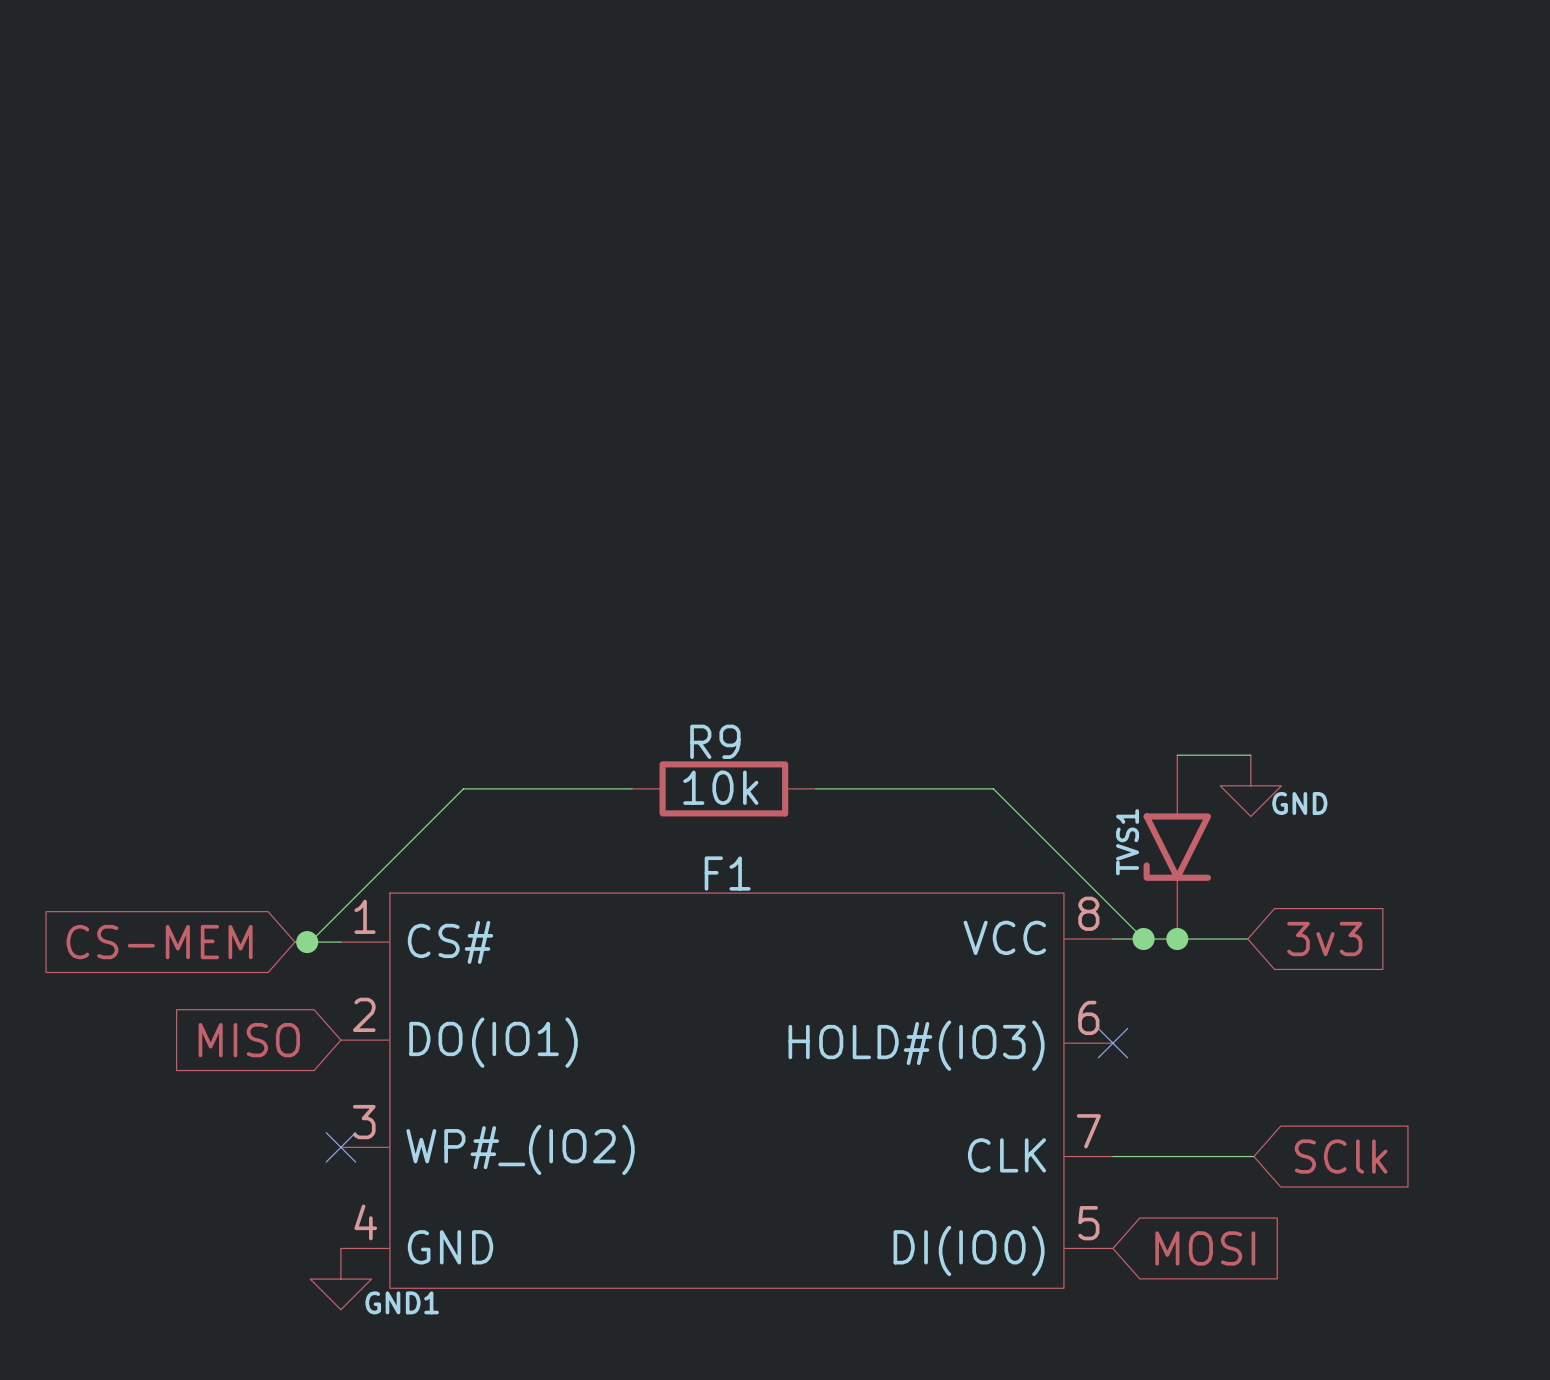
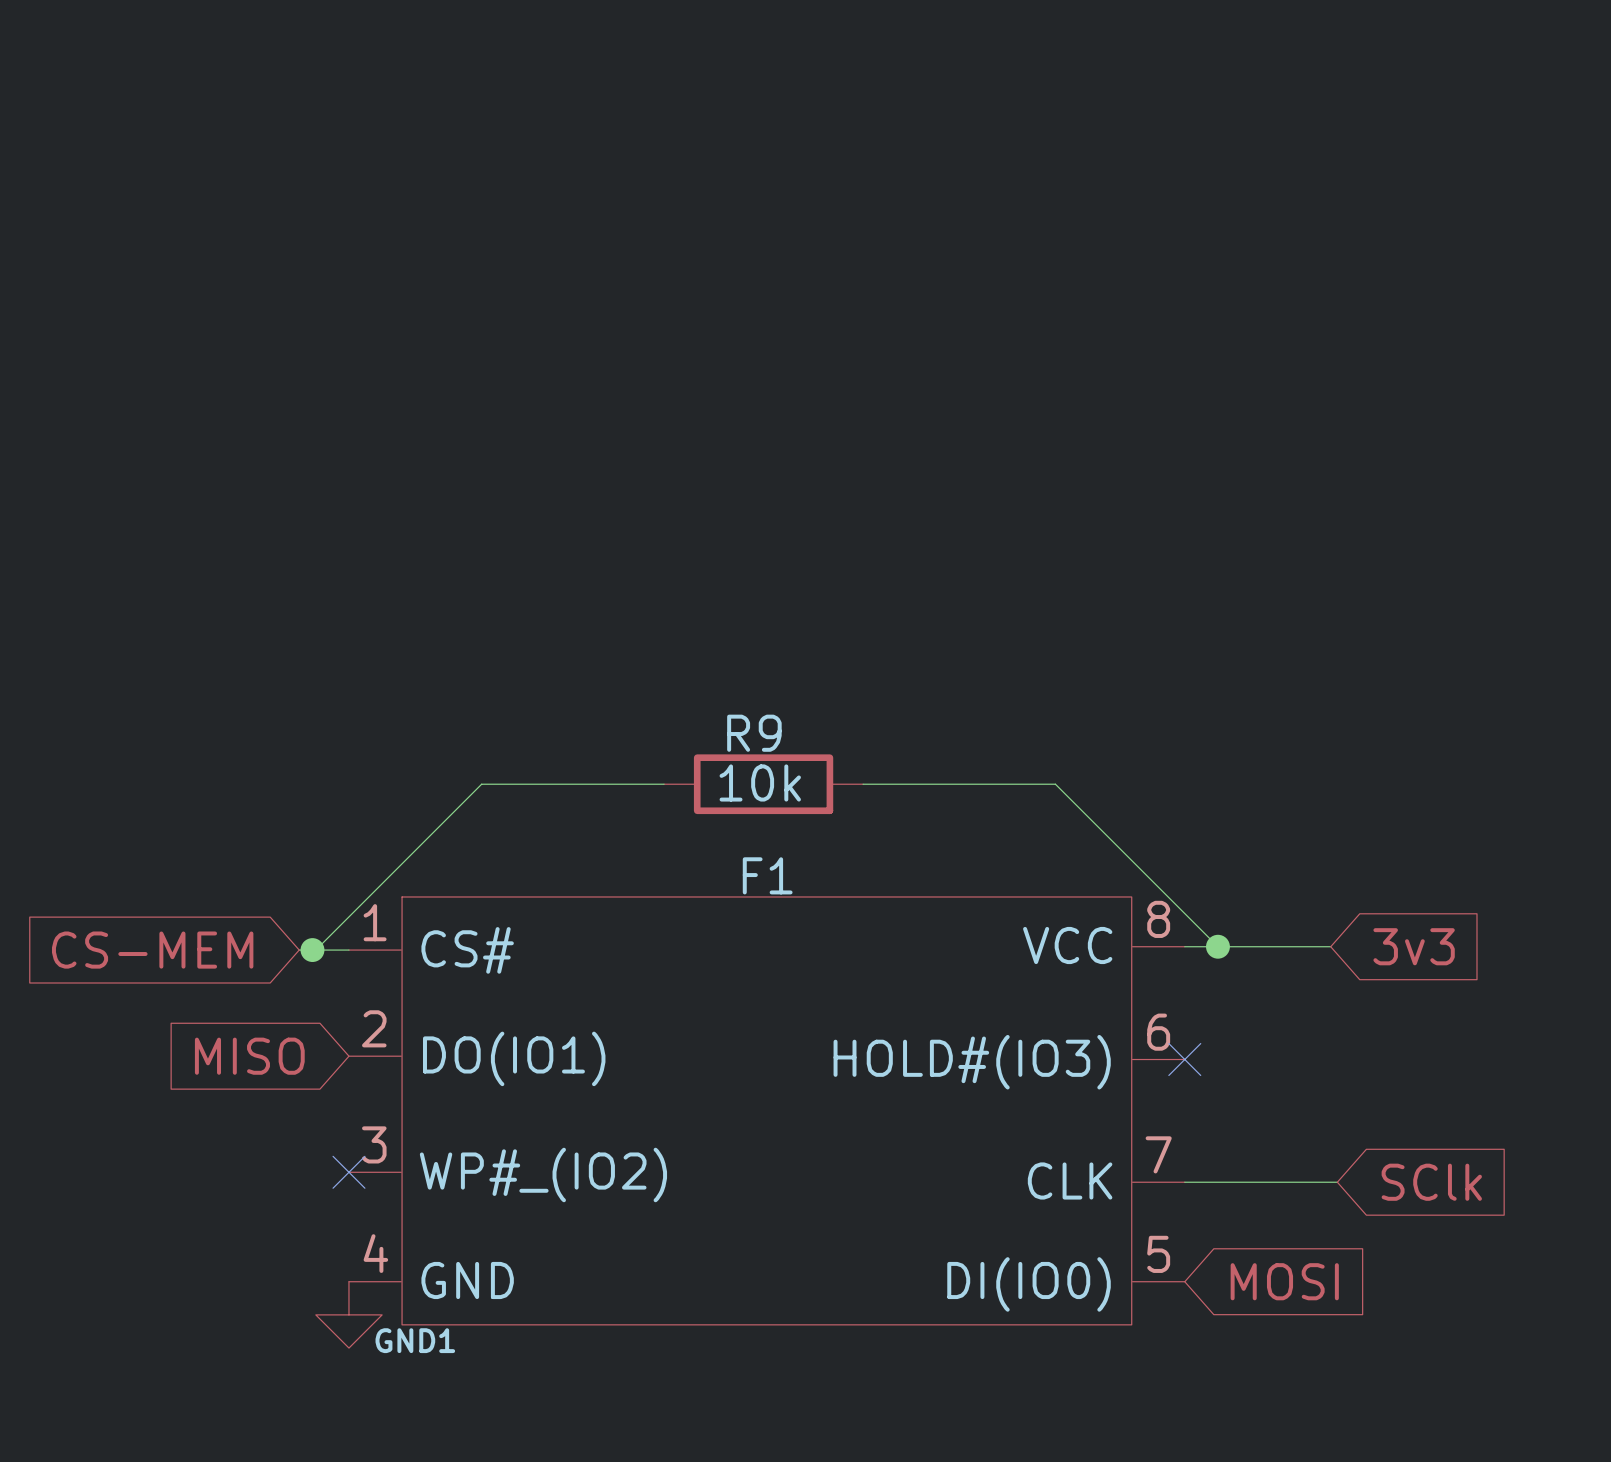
wire: (1177, 755) (1250, 755) -> none
power symbol: GND (1250, 785) -> none
TVS1: (1177, 847) -> none
junction: (1177, 939) -> none

